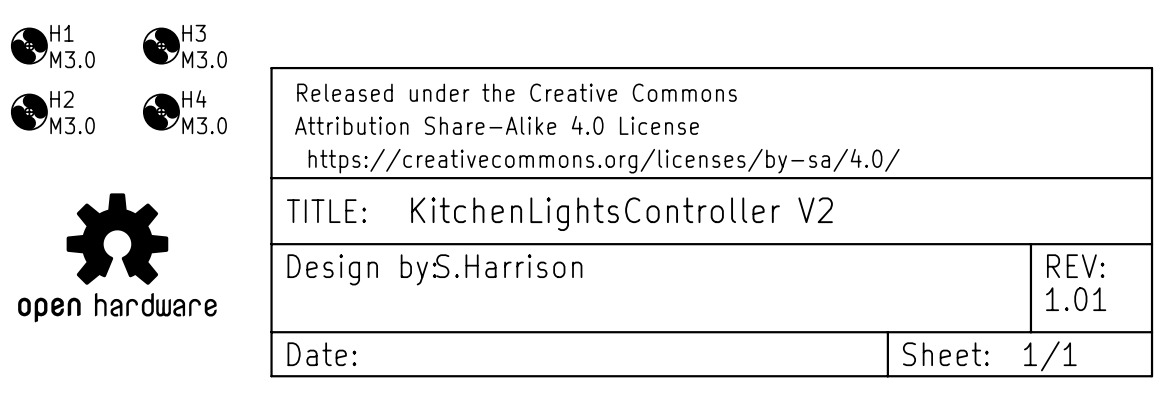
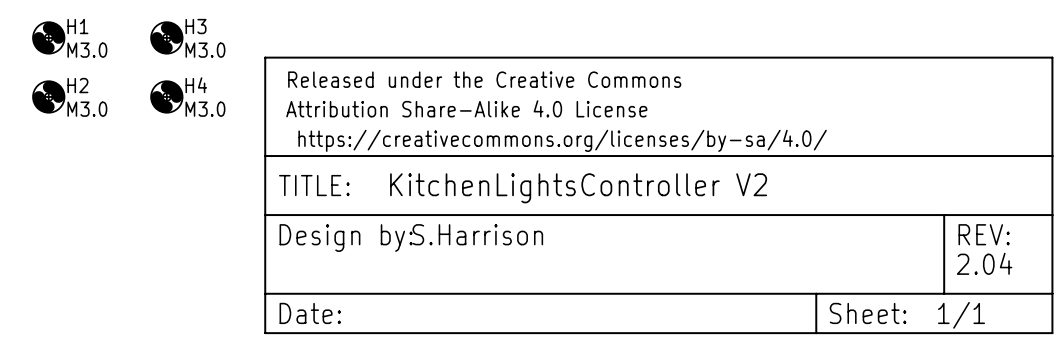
part: (117, 257) -> none
text: 1.01 (1076, 299) -> 2.04 (984, 263)

